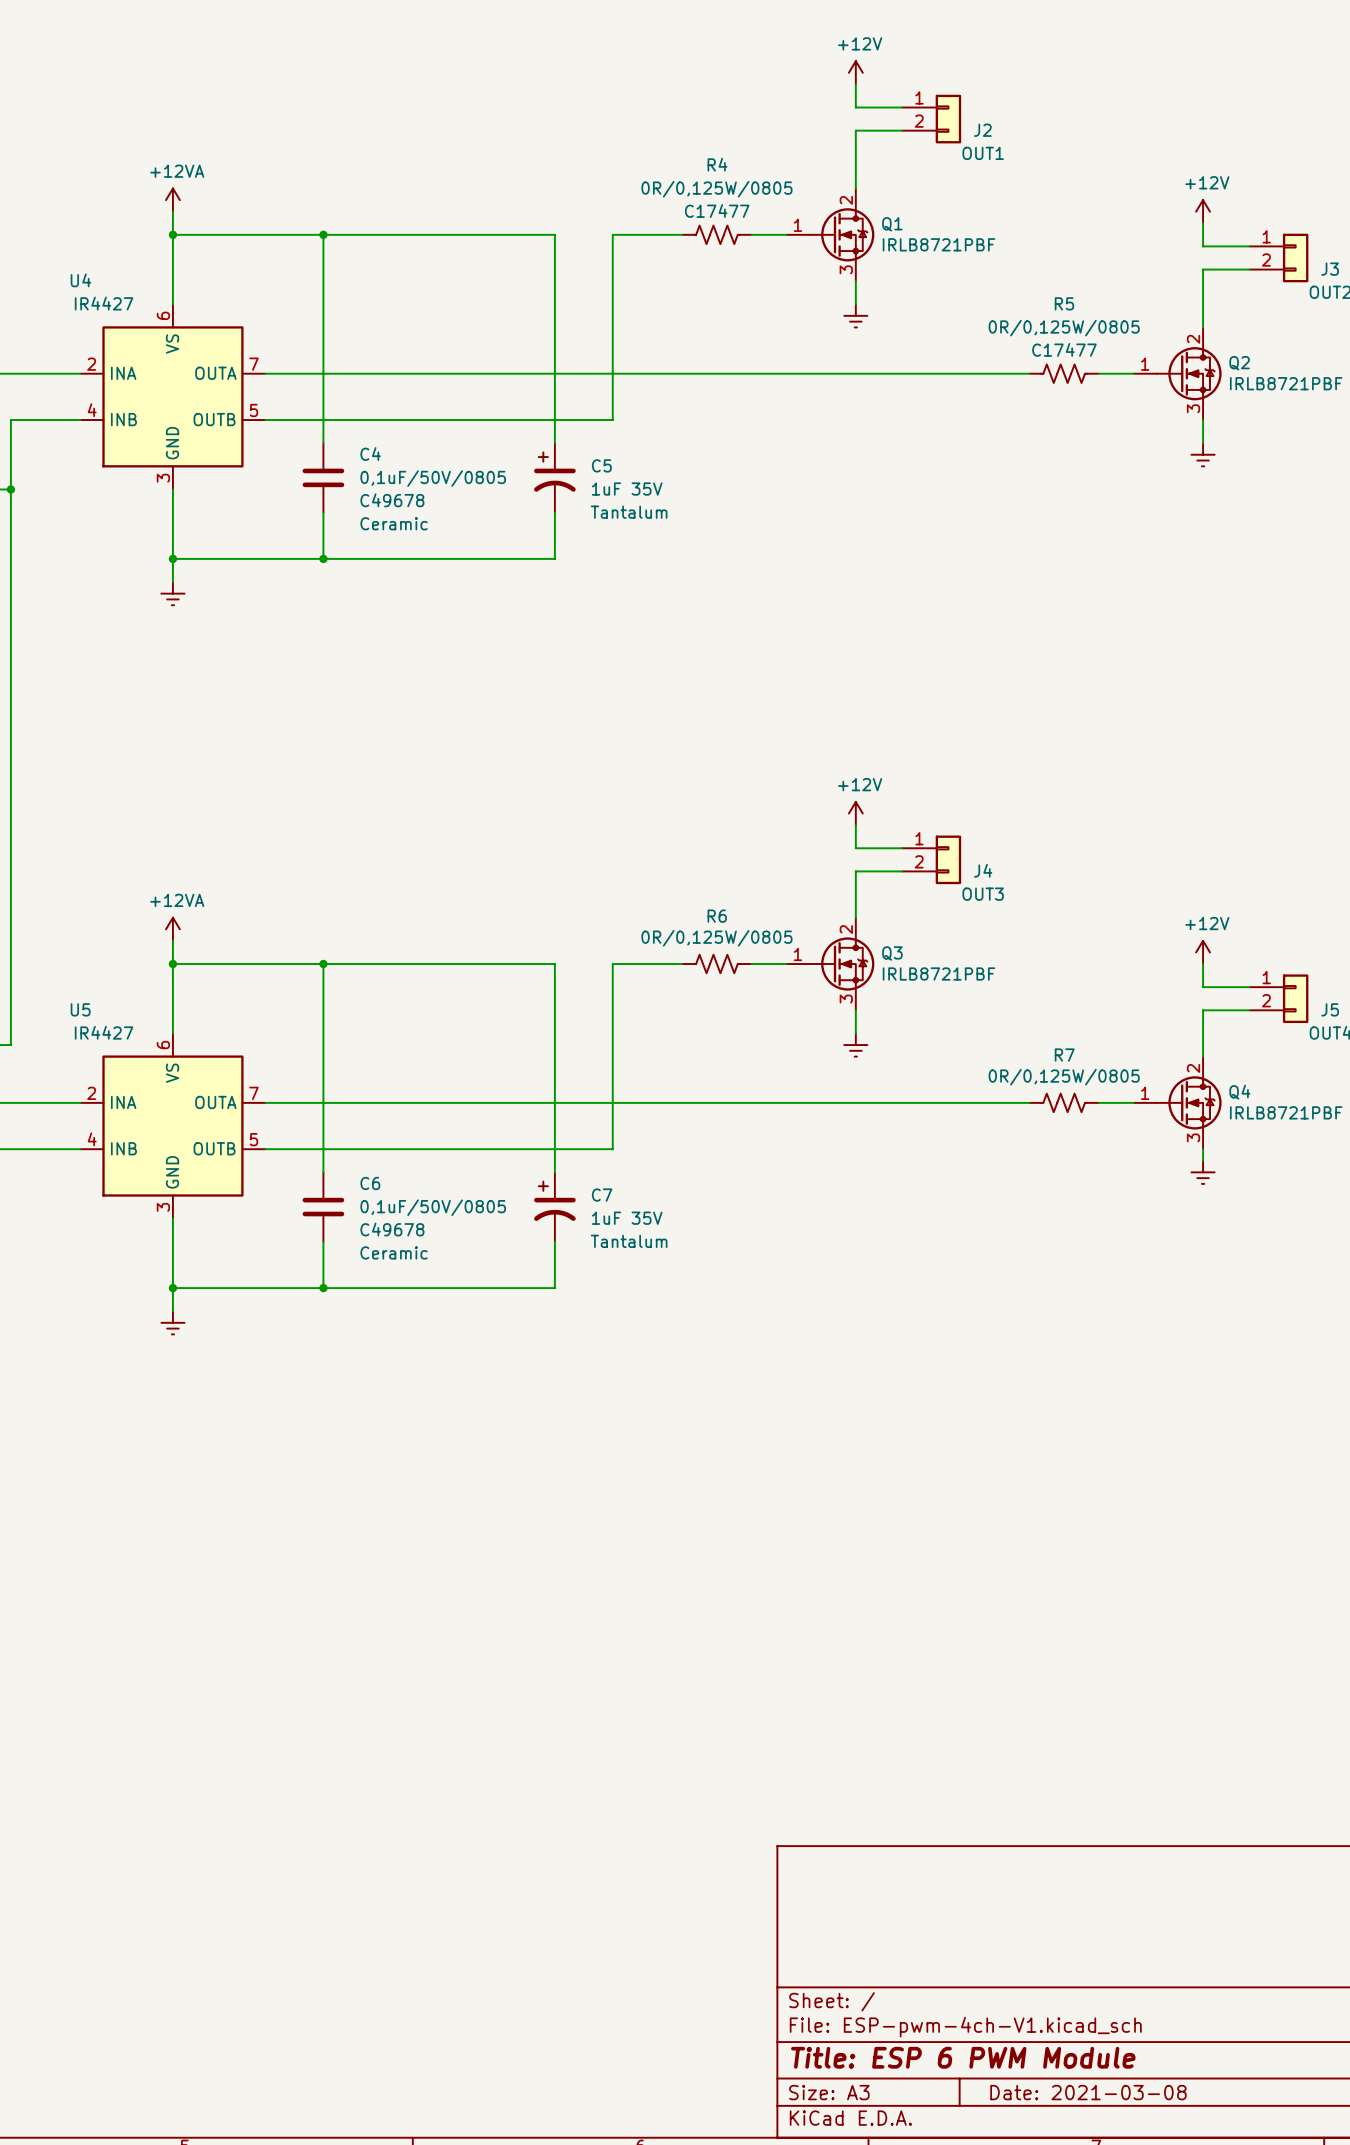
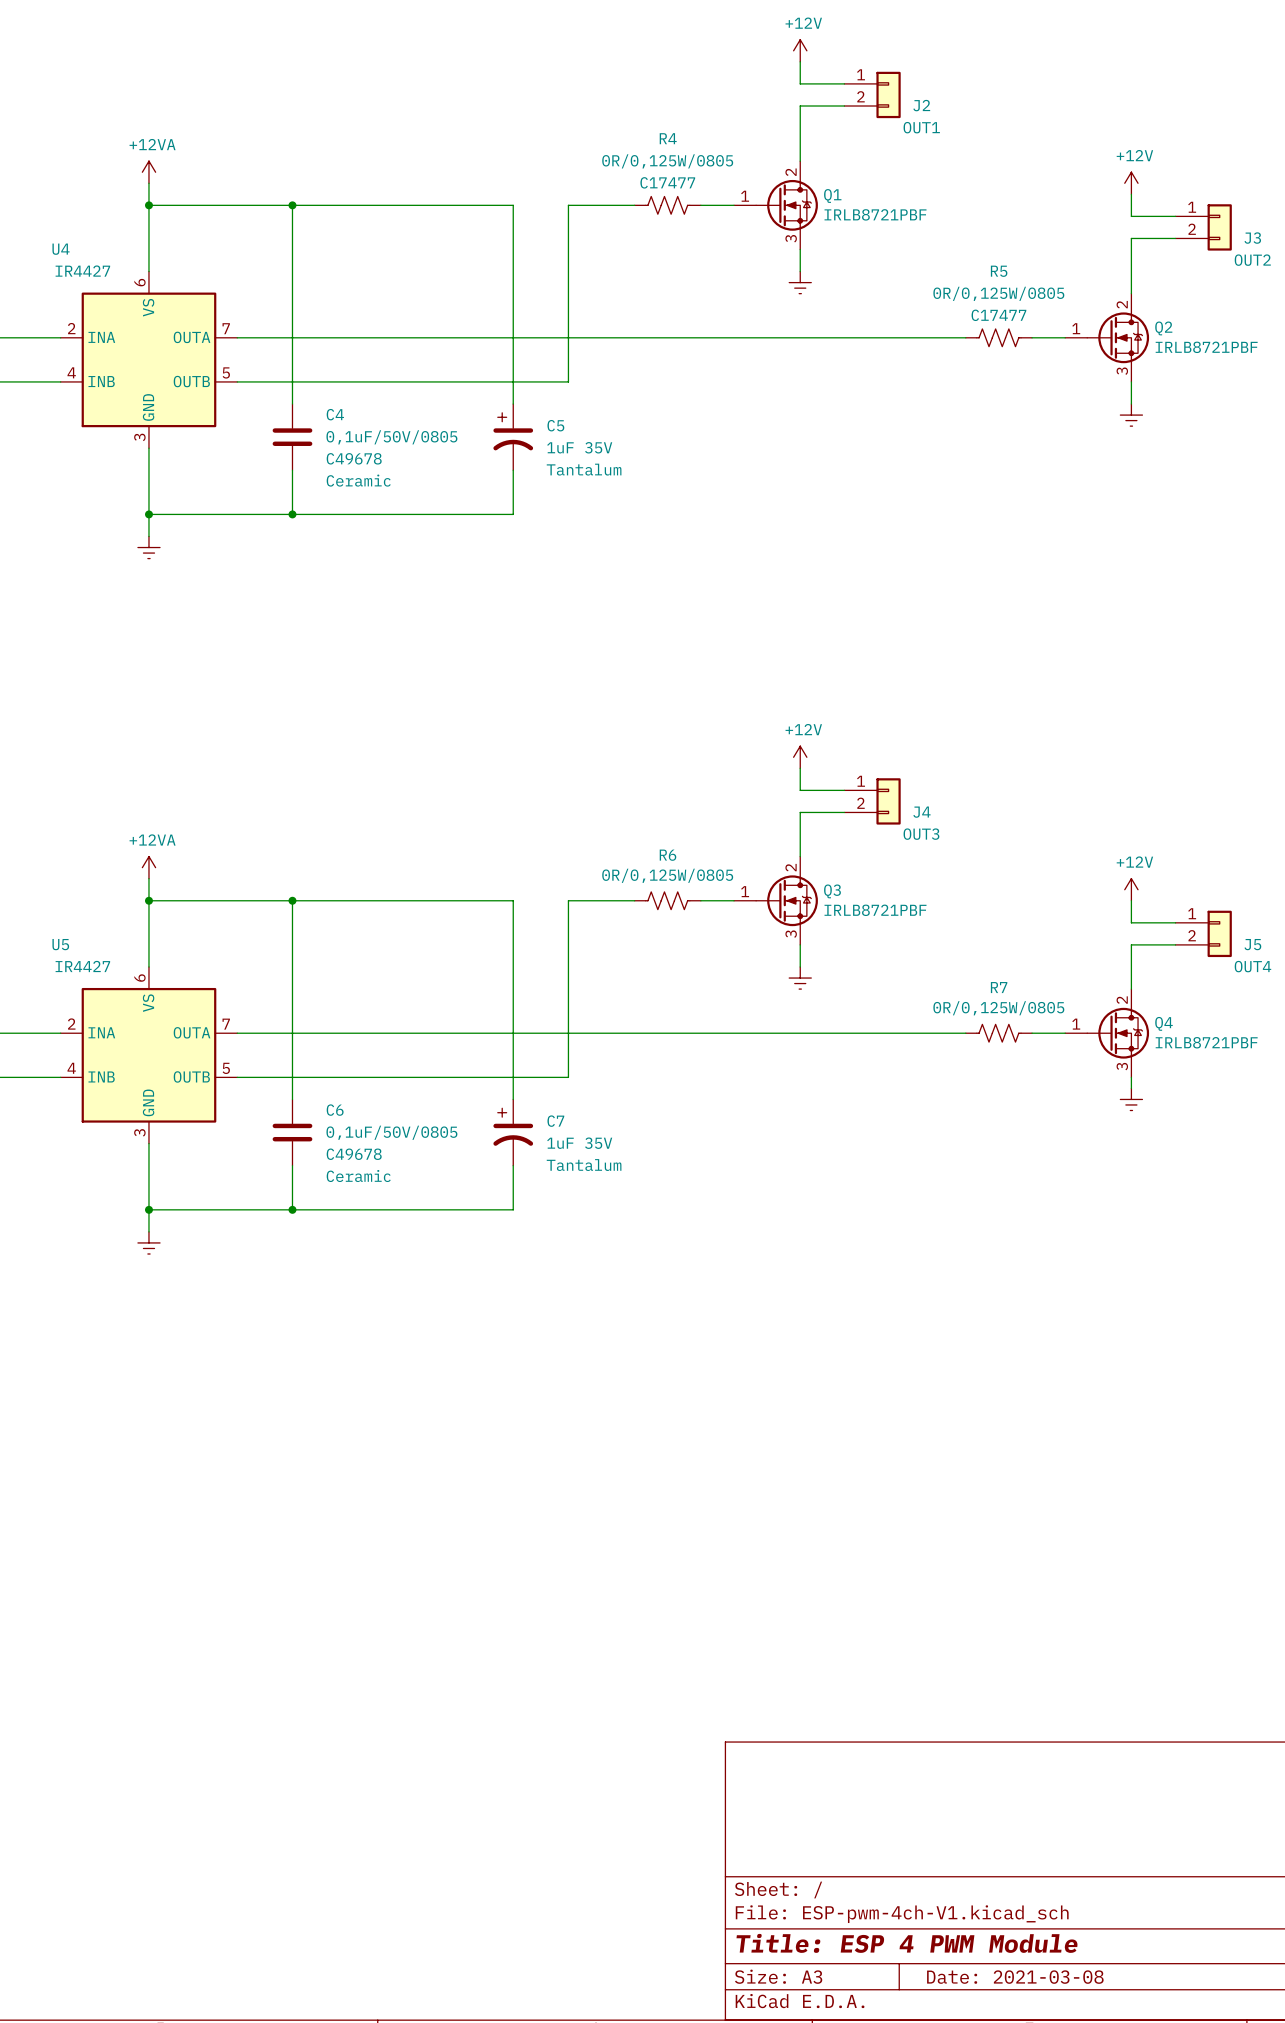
title block: Title: ESP 6 PWM Module (963, 2057) -> Title: ESP 4 PWM Module (907, 1943)

